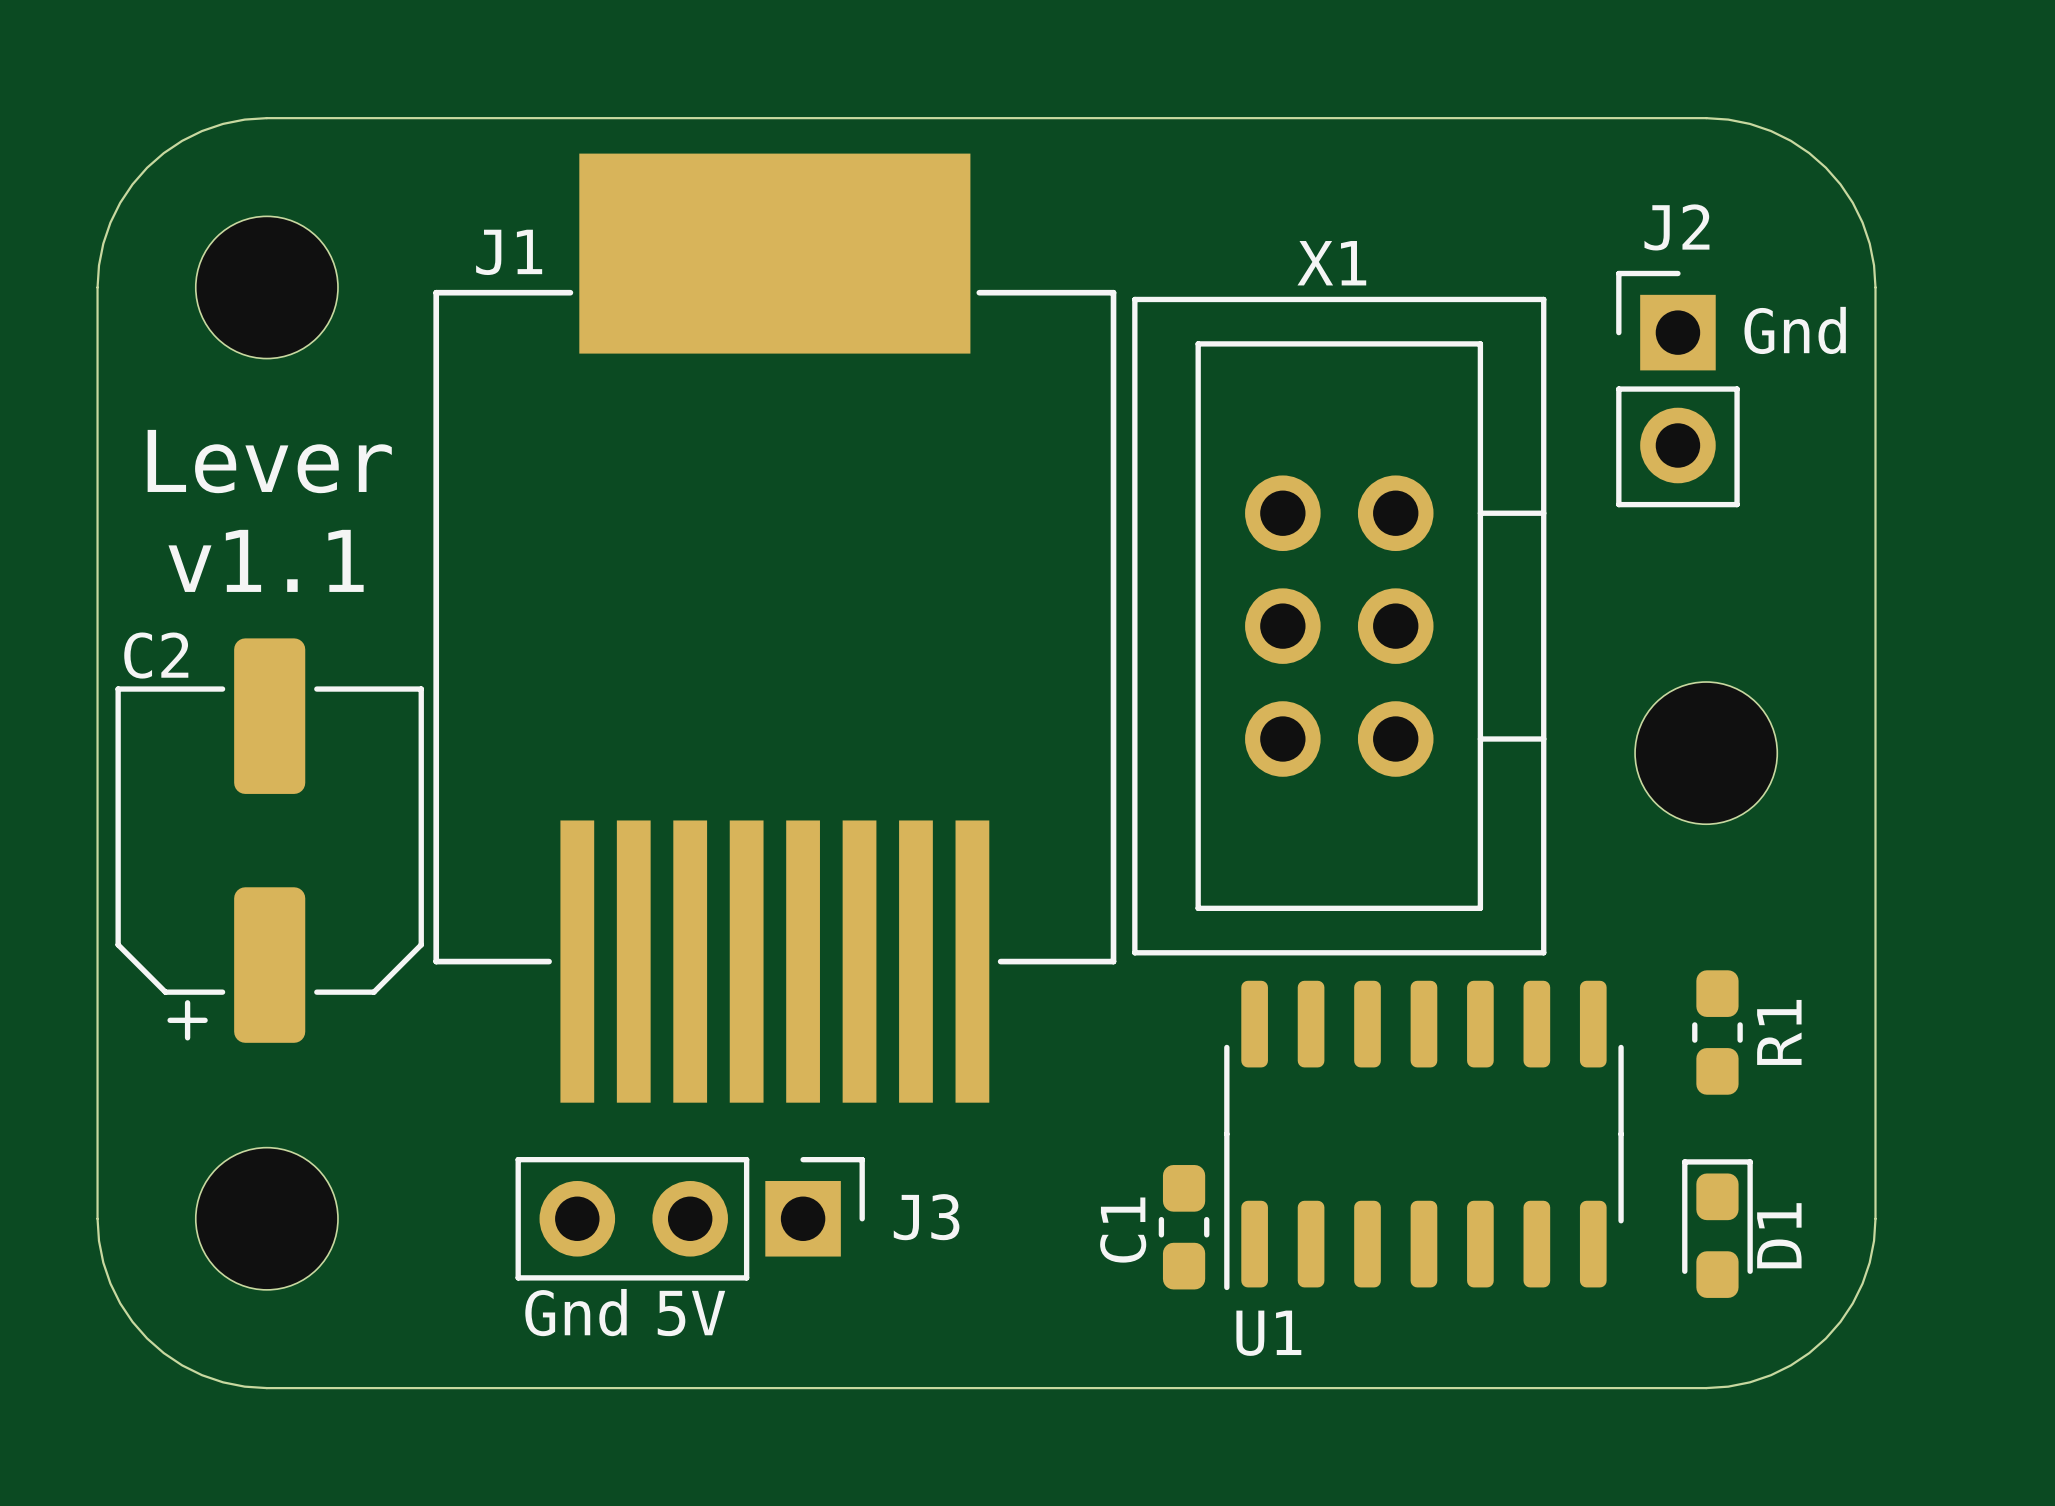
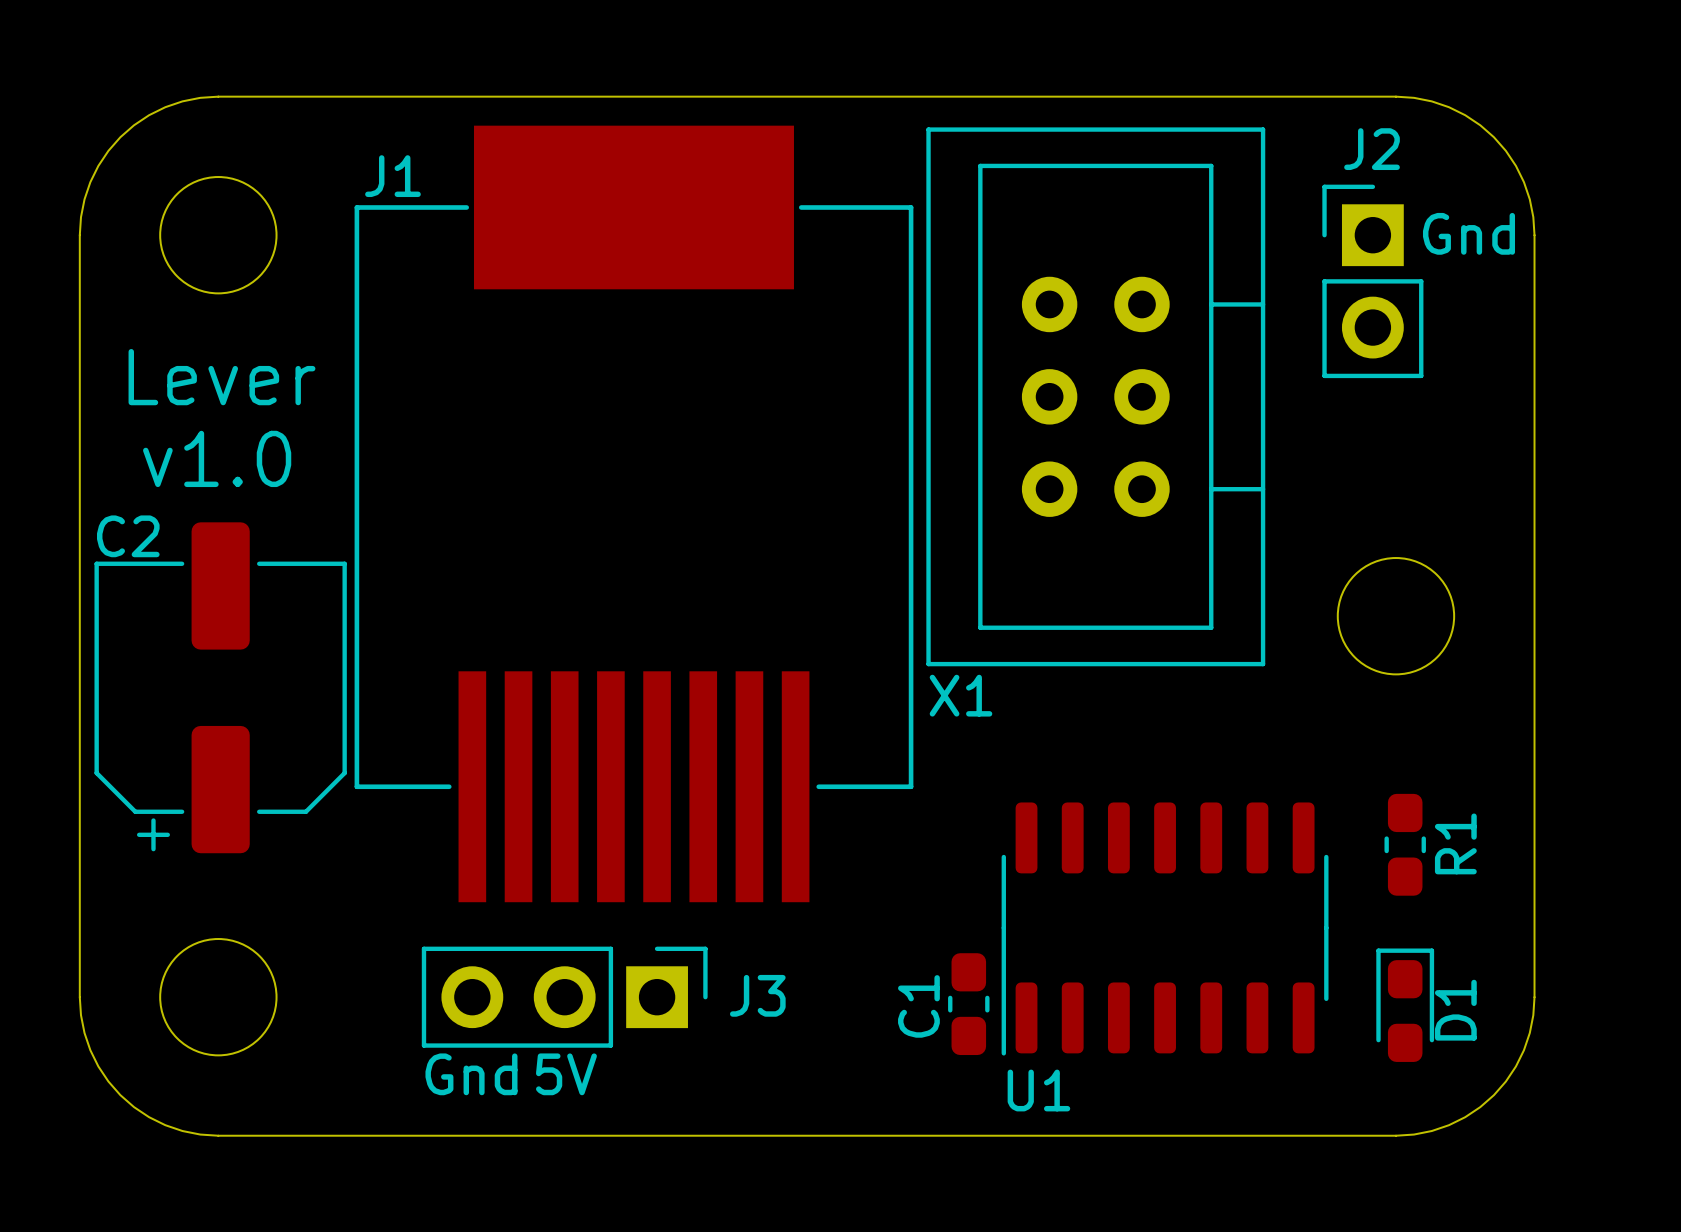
J1 footprint: [433, 153, 1117, 1103] -> [354, 125, 914, 903]
J1 name position: J1 (509, 252) -> J1 (392, 176)
X1 name position: X1 (1331, 263) -> X1 (961, 695)
X1 footprint: [1132, 296, 1547, 956] -> [926, 127, 1266, 667]
text position: Gnd (1795, 330) -> Gnd (1468, 233)
J2 position: (1677, 389) -> (1372, 281)
text: v1.1 (266, 560) -> v1.0 (217, 458)

